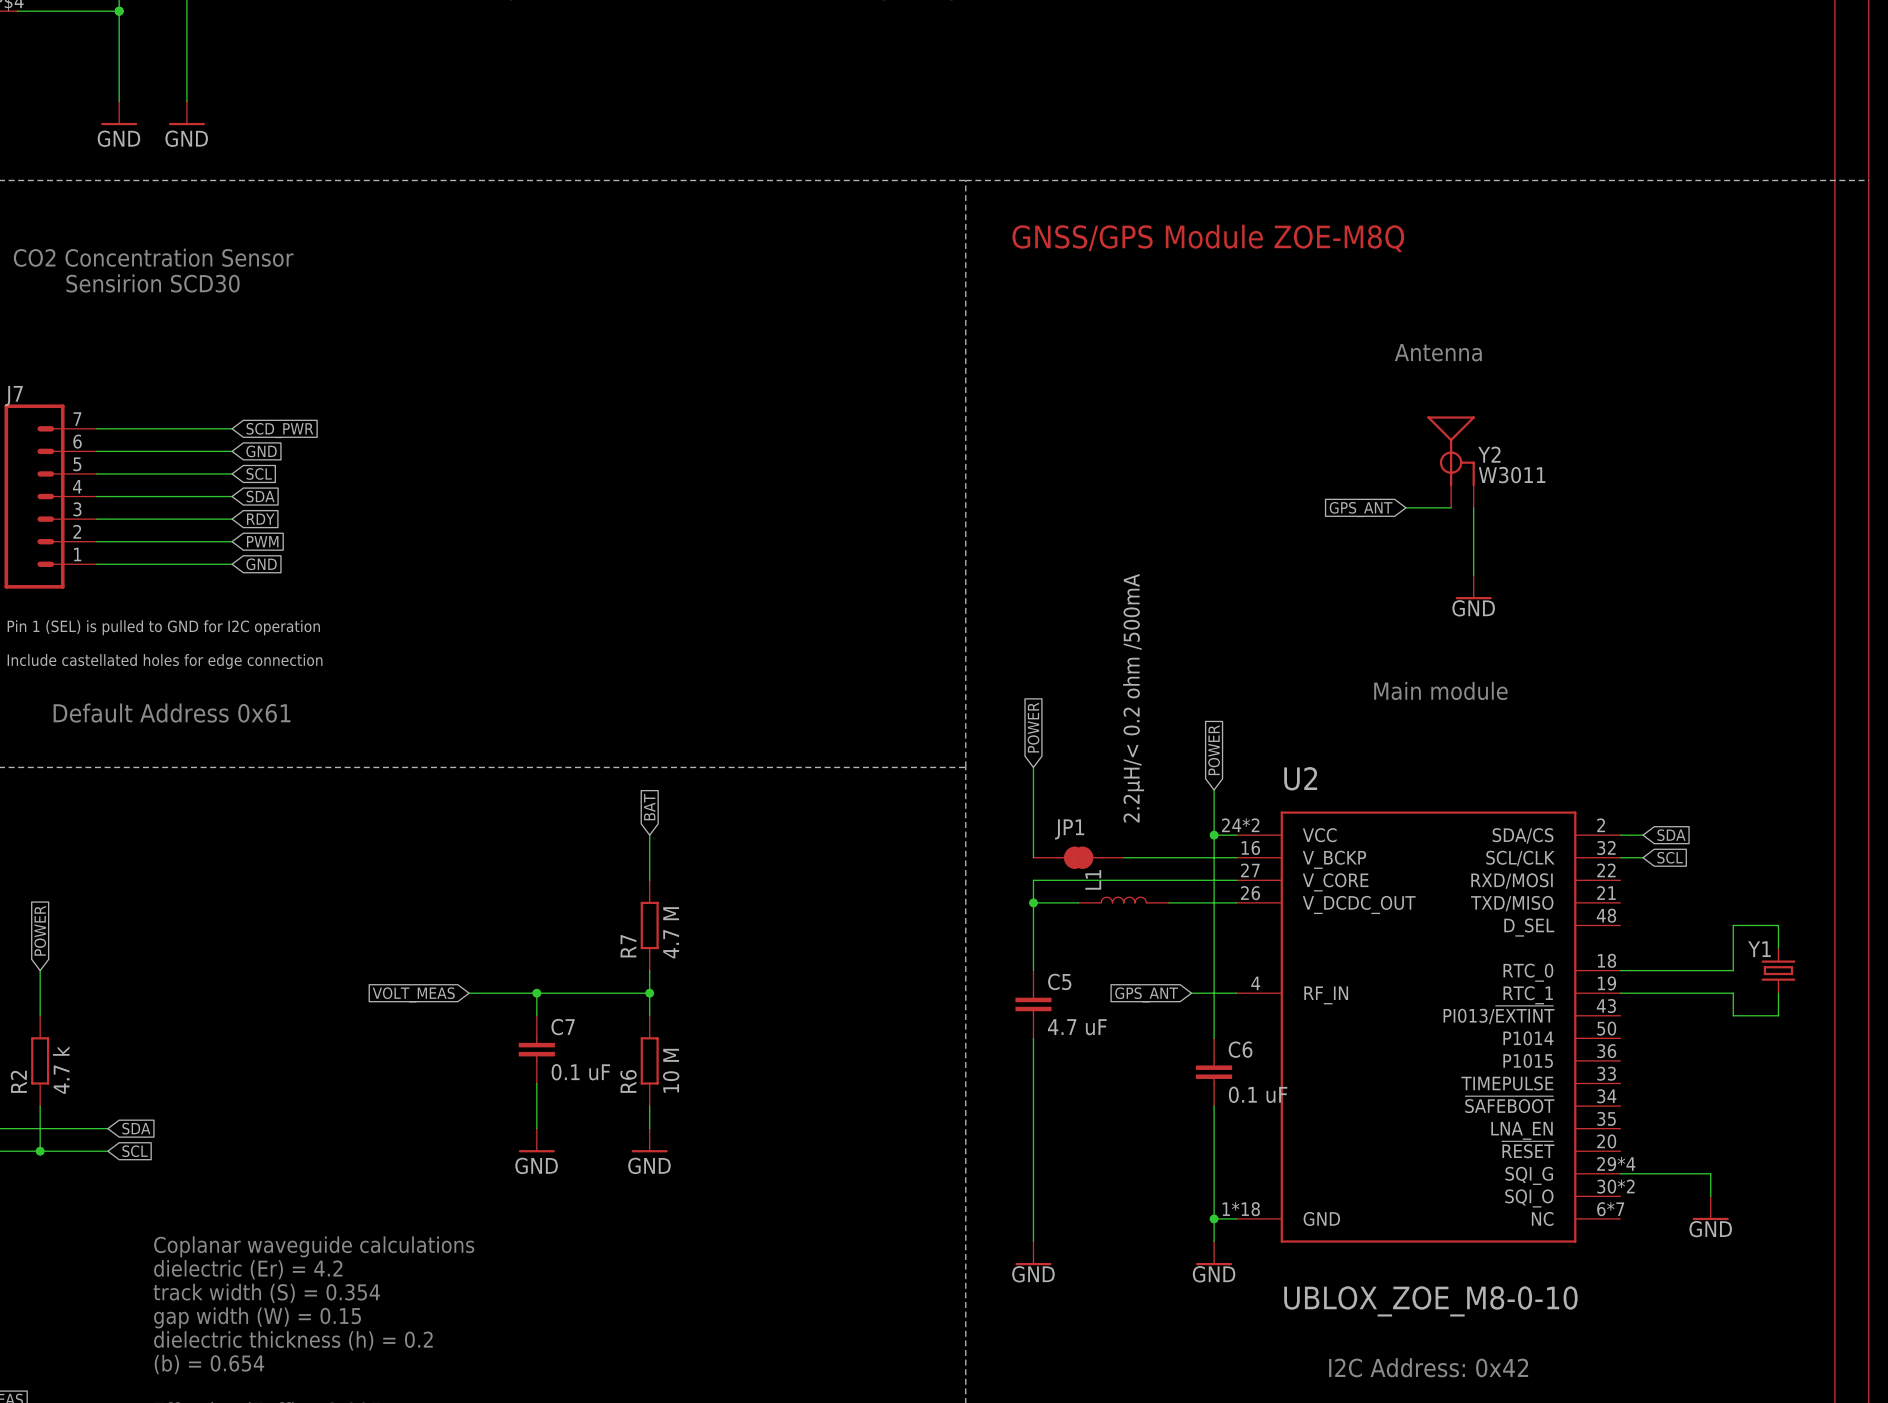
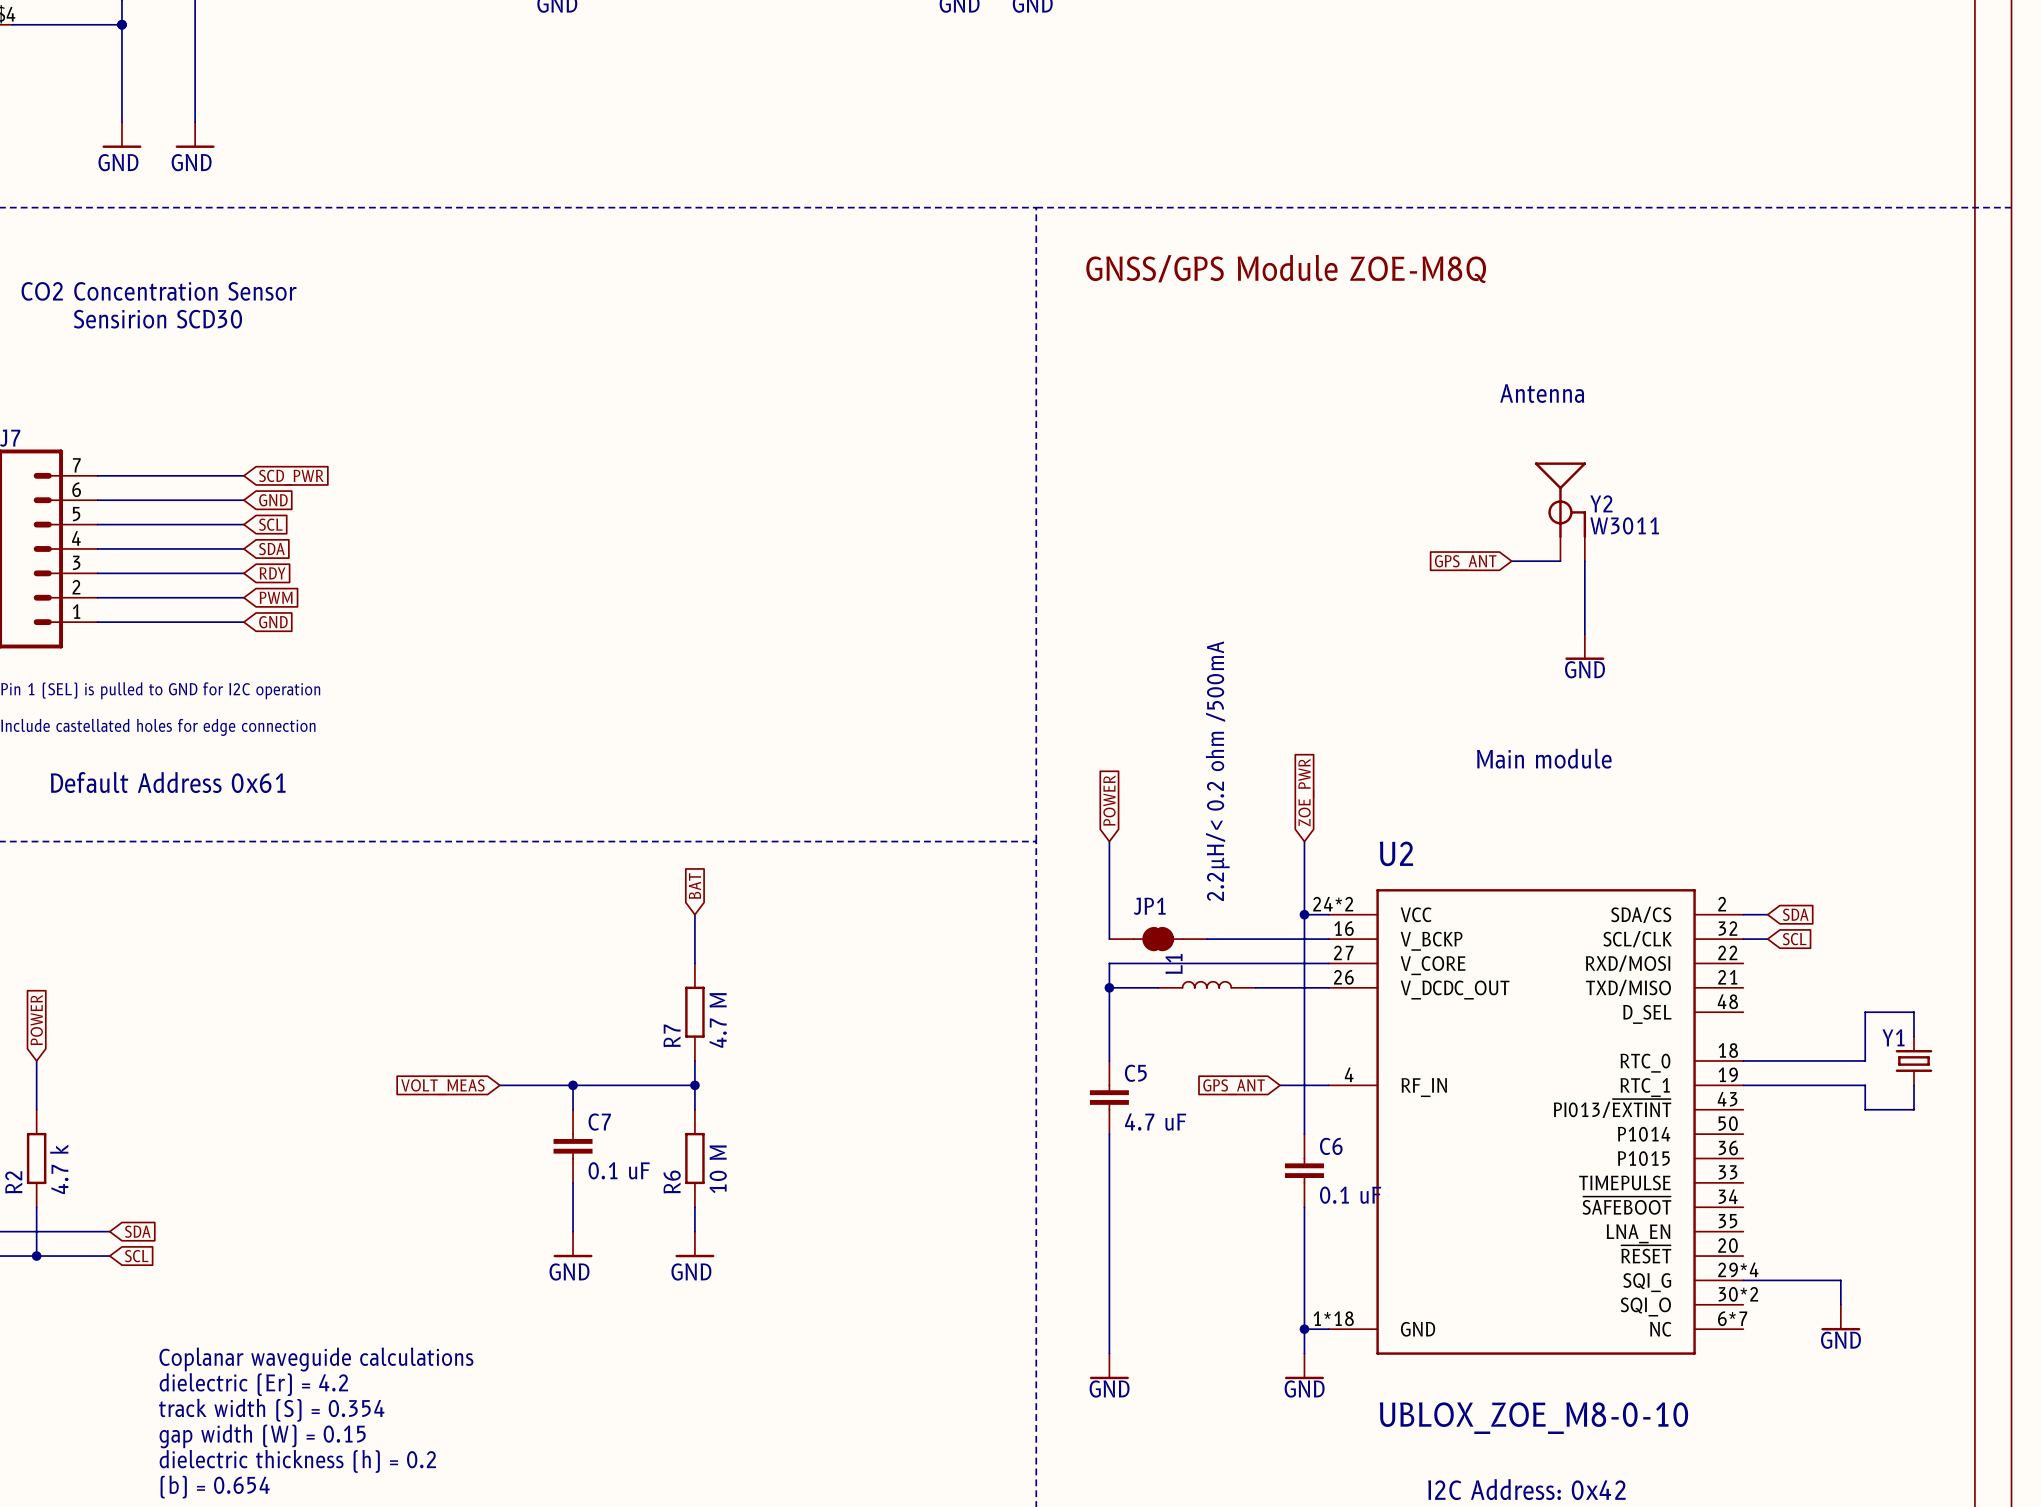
global label: none -> ZOE_PWR (1306, 792)
global label: POWER (1214, 750) -> none
wire: none -> (1304, 841) (1304, 865)

